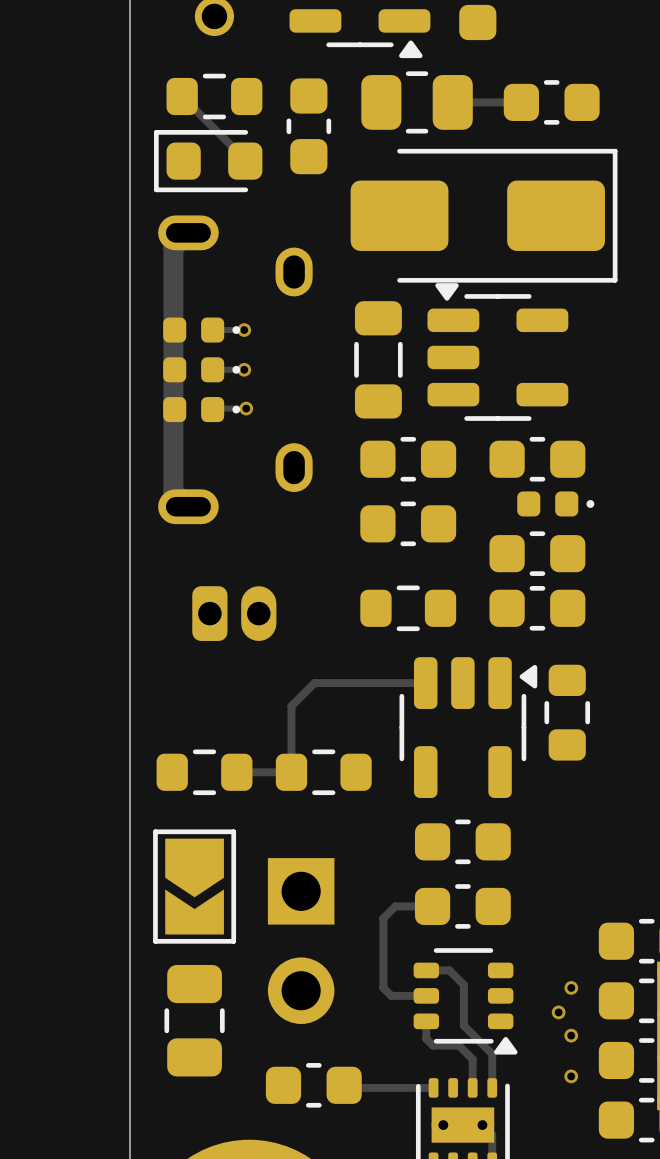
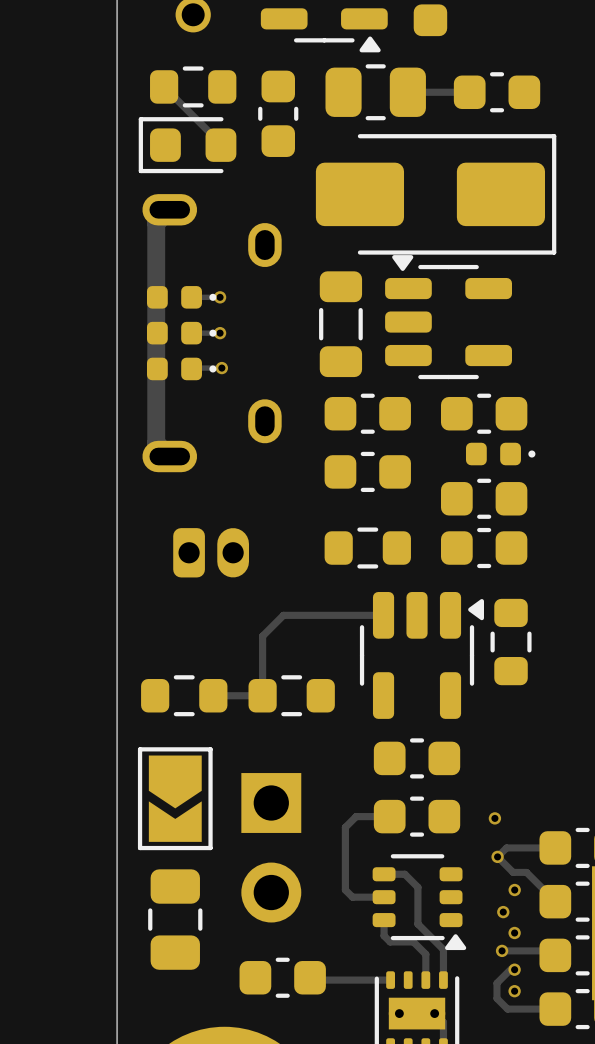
via: none -> (494, 818)
track: none -> (555, 847) (506, 847) (497, 856) (513, 872) (526, 872) (555, 901)
via: none -> (497, 856)
track: none -> (502, 950) (550, 950) (555, 955)
via: none -> (502, 950)
track: none -> (511, 969) (496, 983) (496, 998) (507, 1009) (555, 1009)
via: none -> (514, 991)

